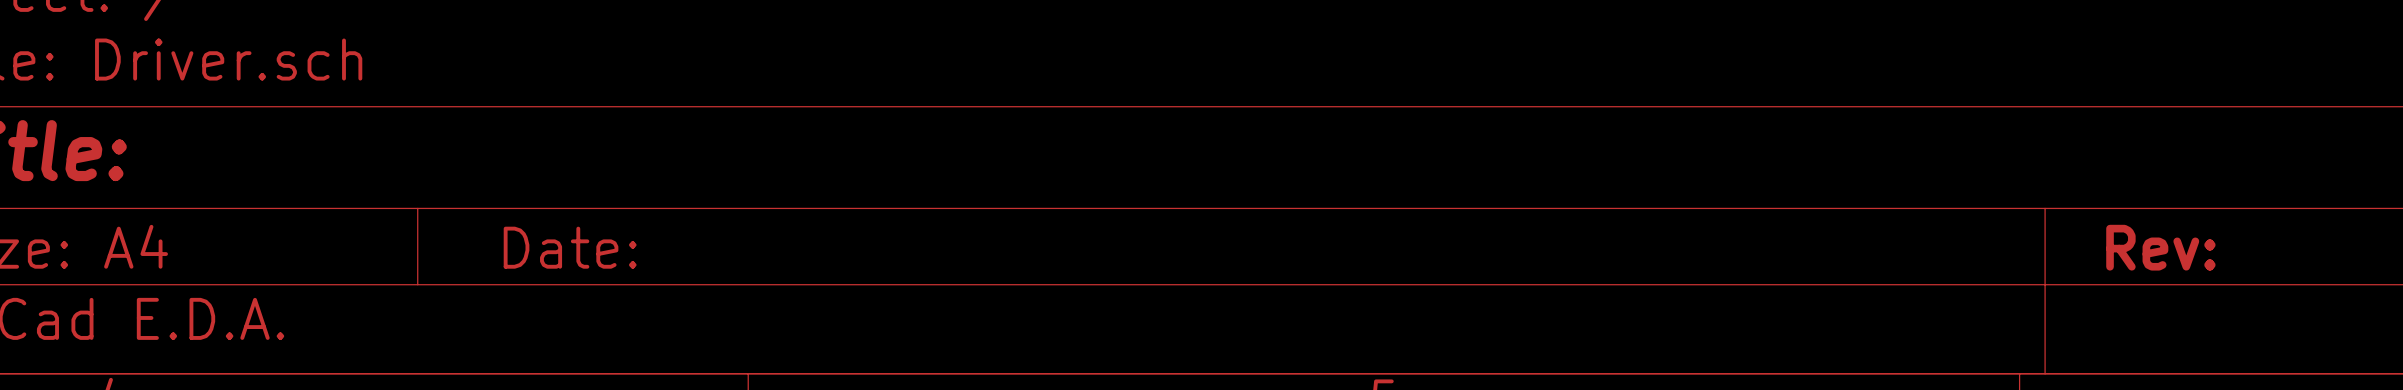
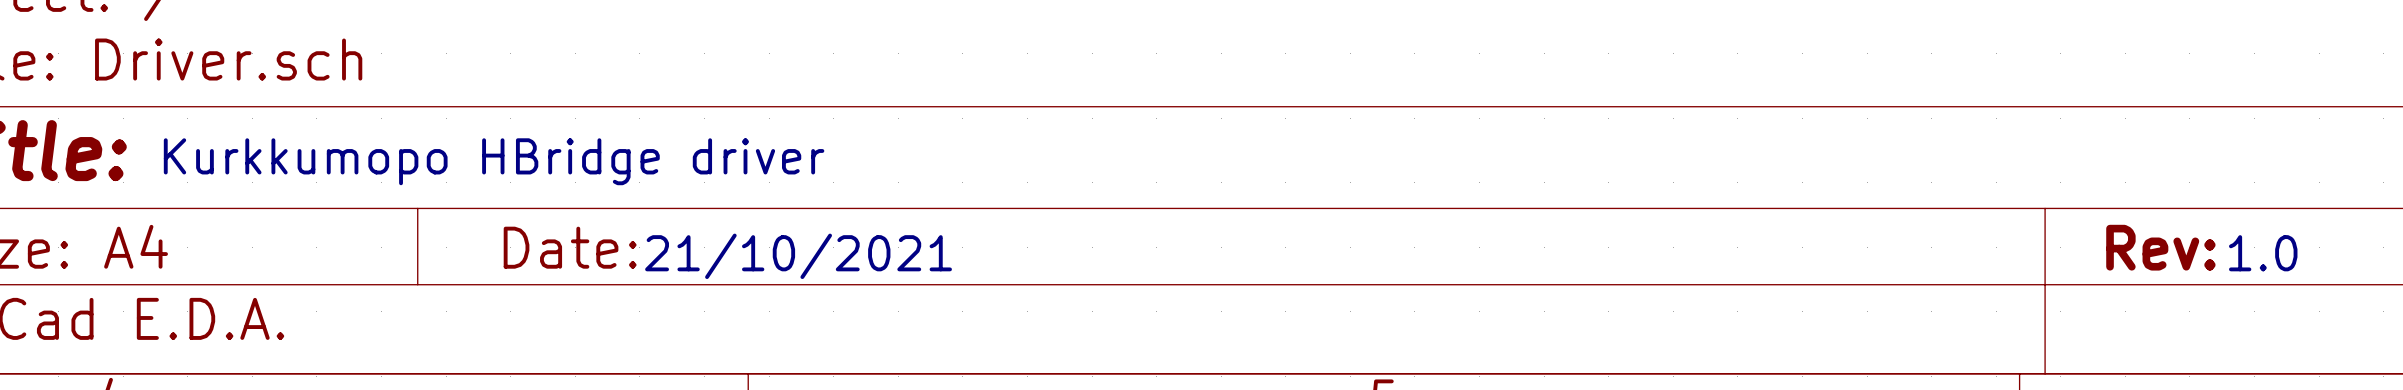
text: none -> Kurkkumopo HBridge driver (494, 161)
text: none -> 1.0 (2263, 253)
text: none -> 21/10/2021 (798, 256)

